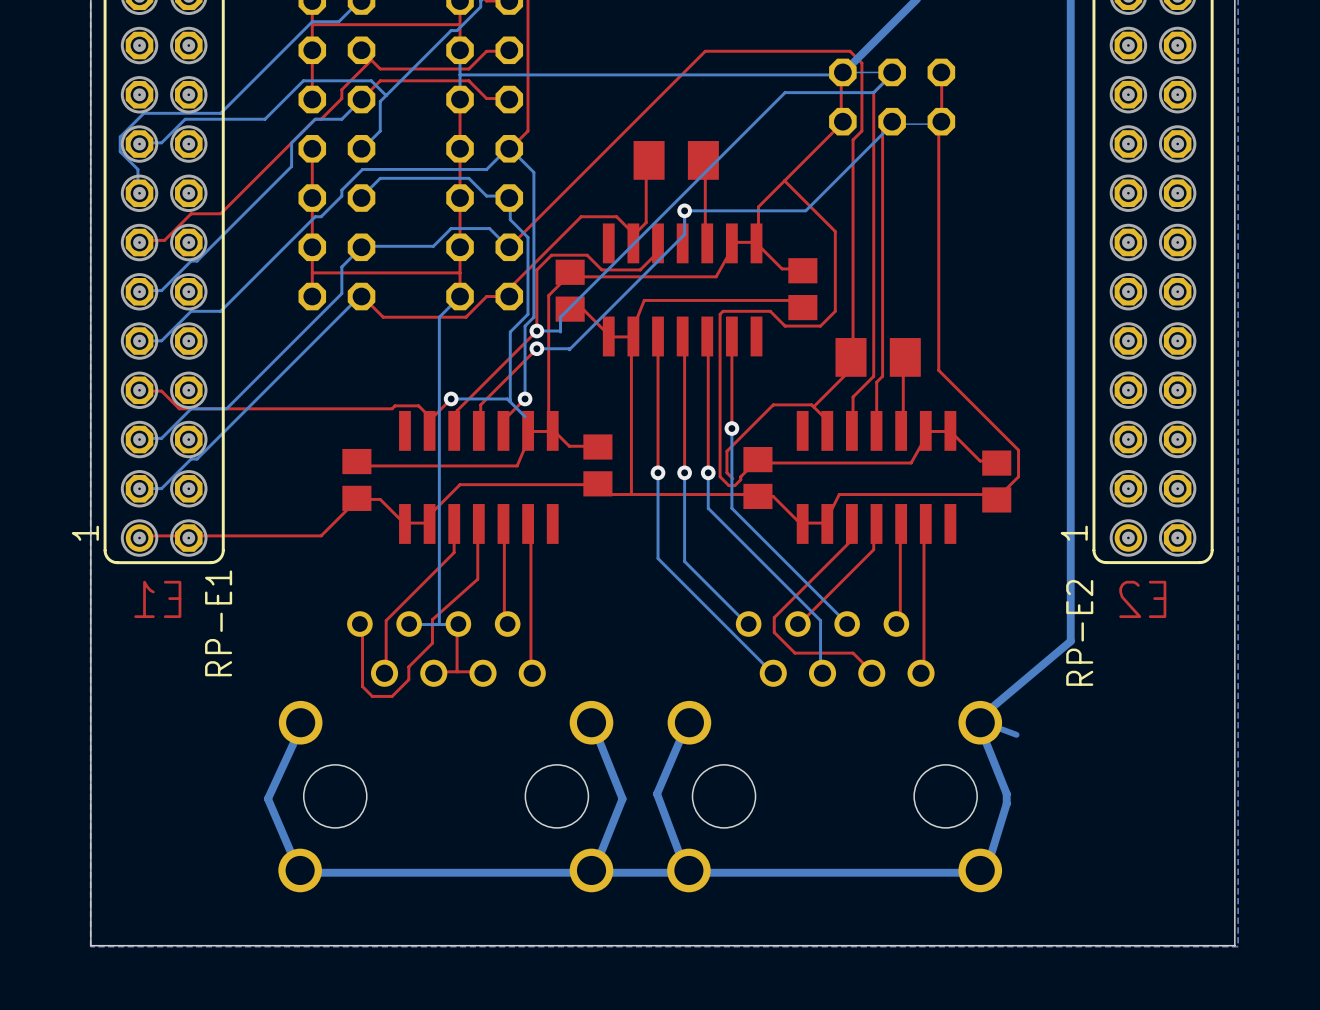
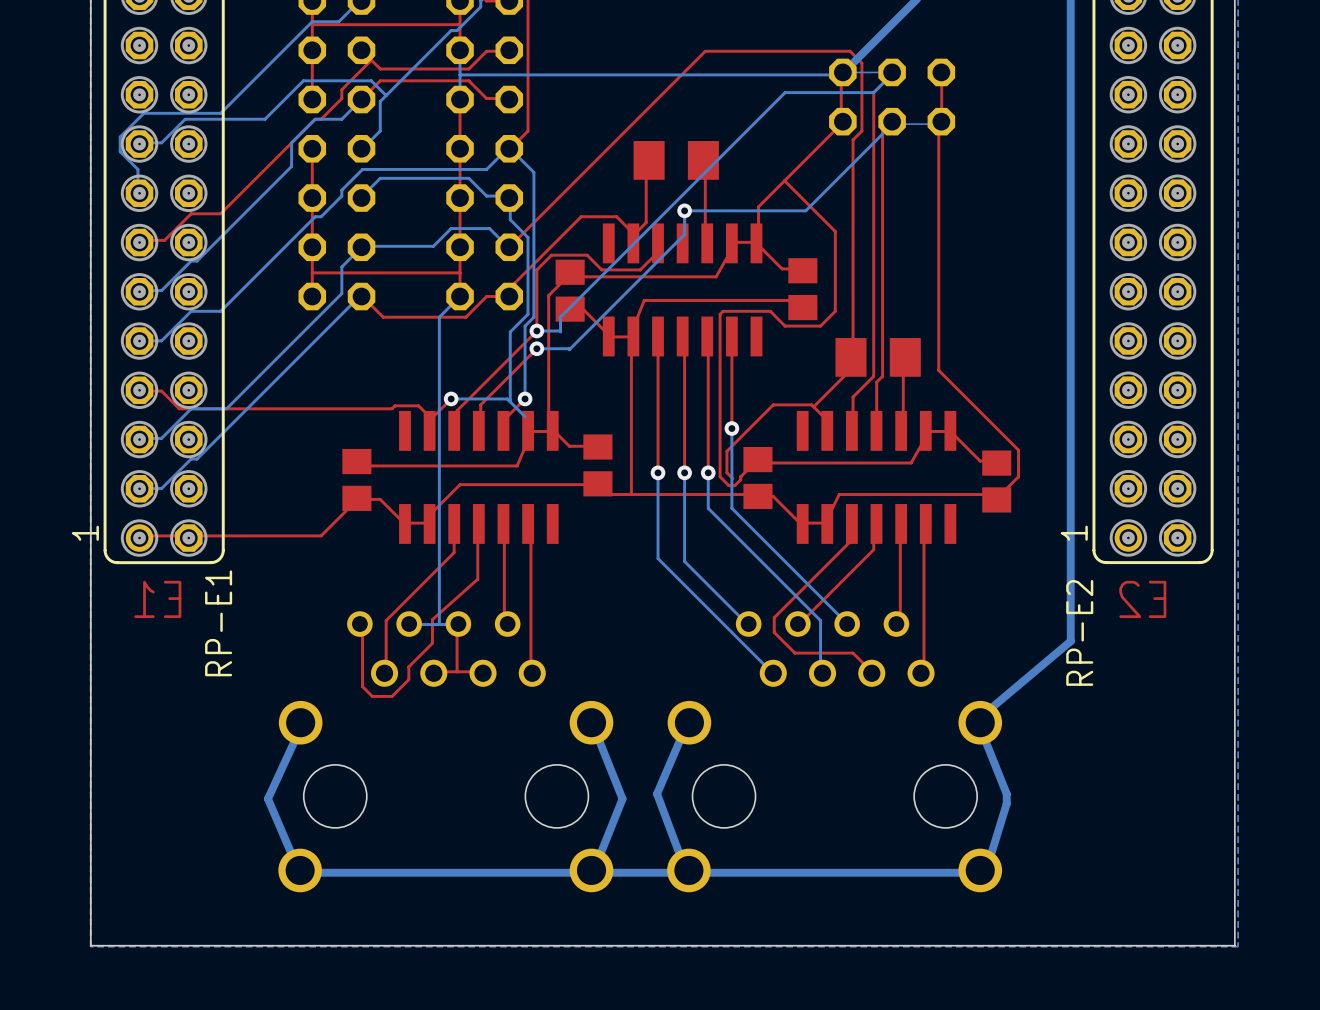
bottom track: (977, 720) (1016, 734) -> none

